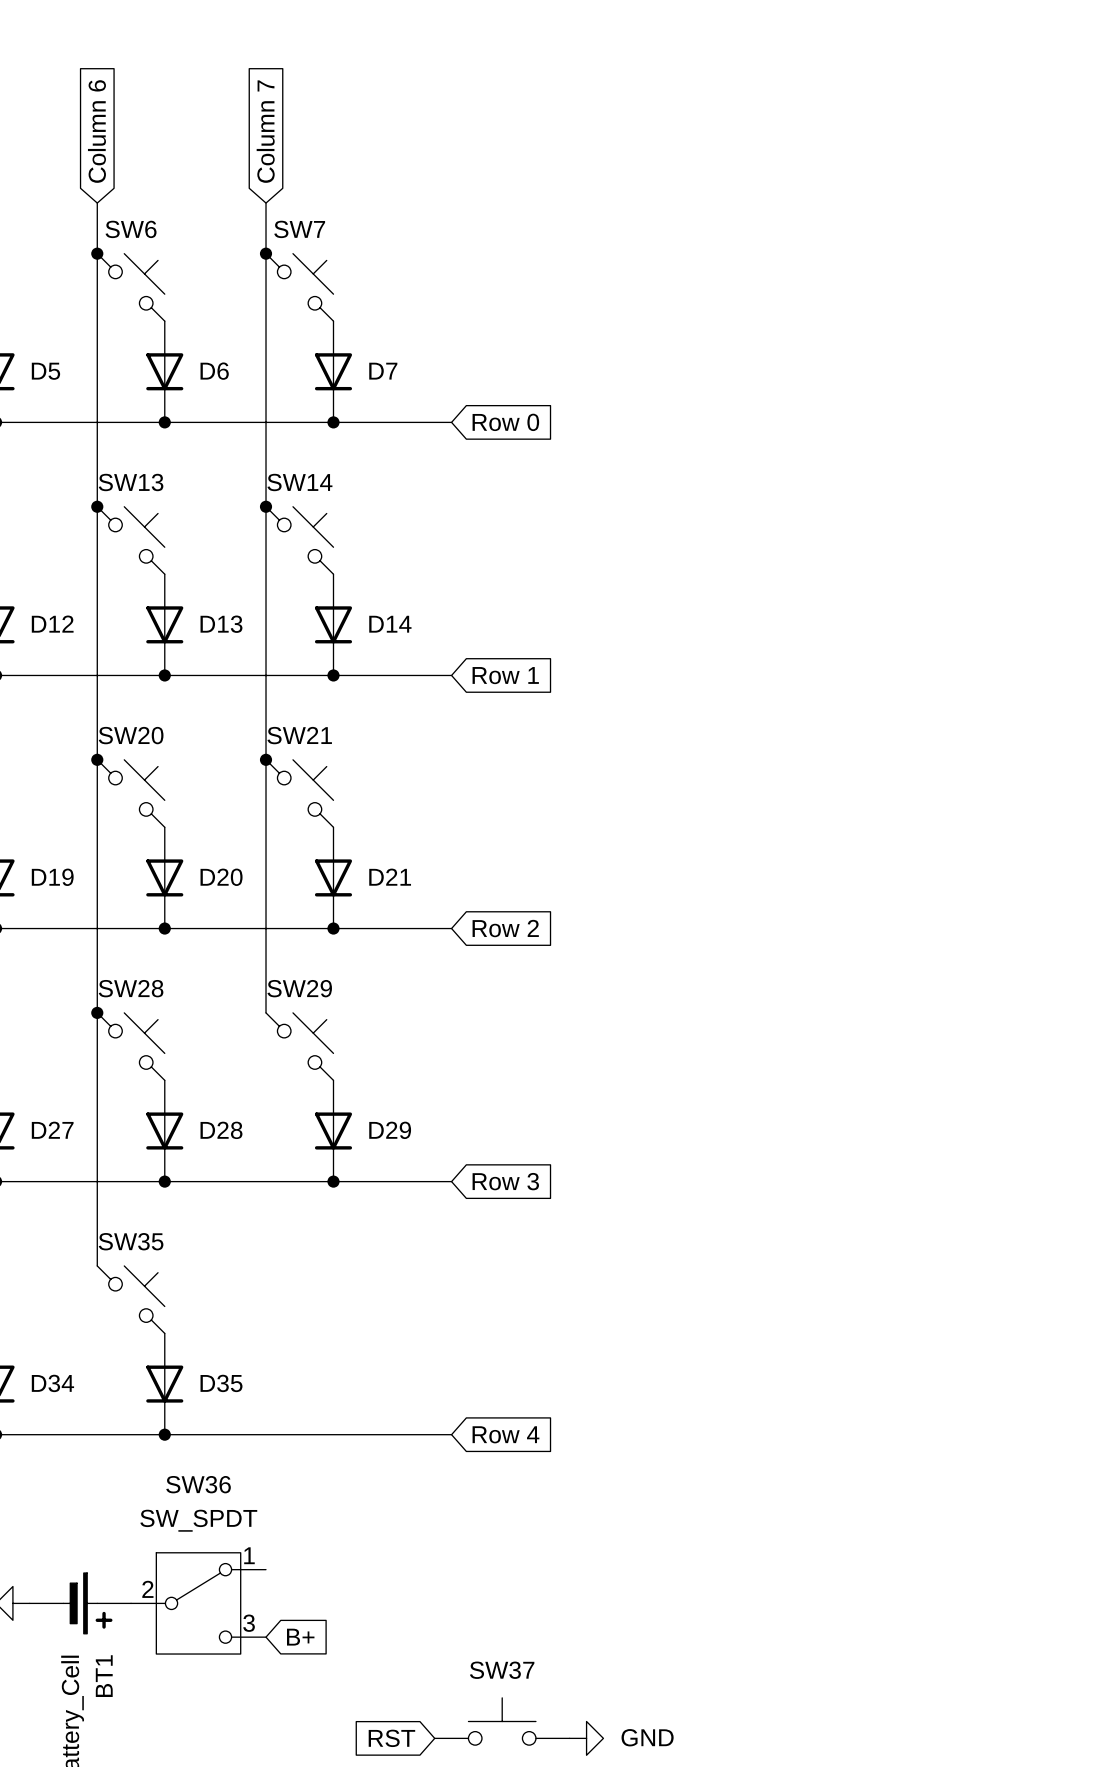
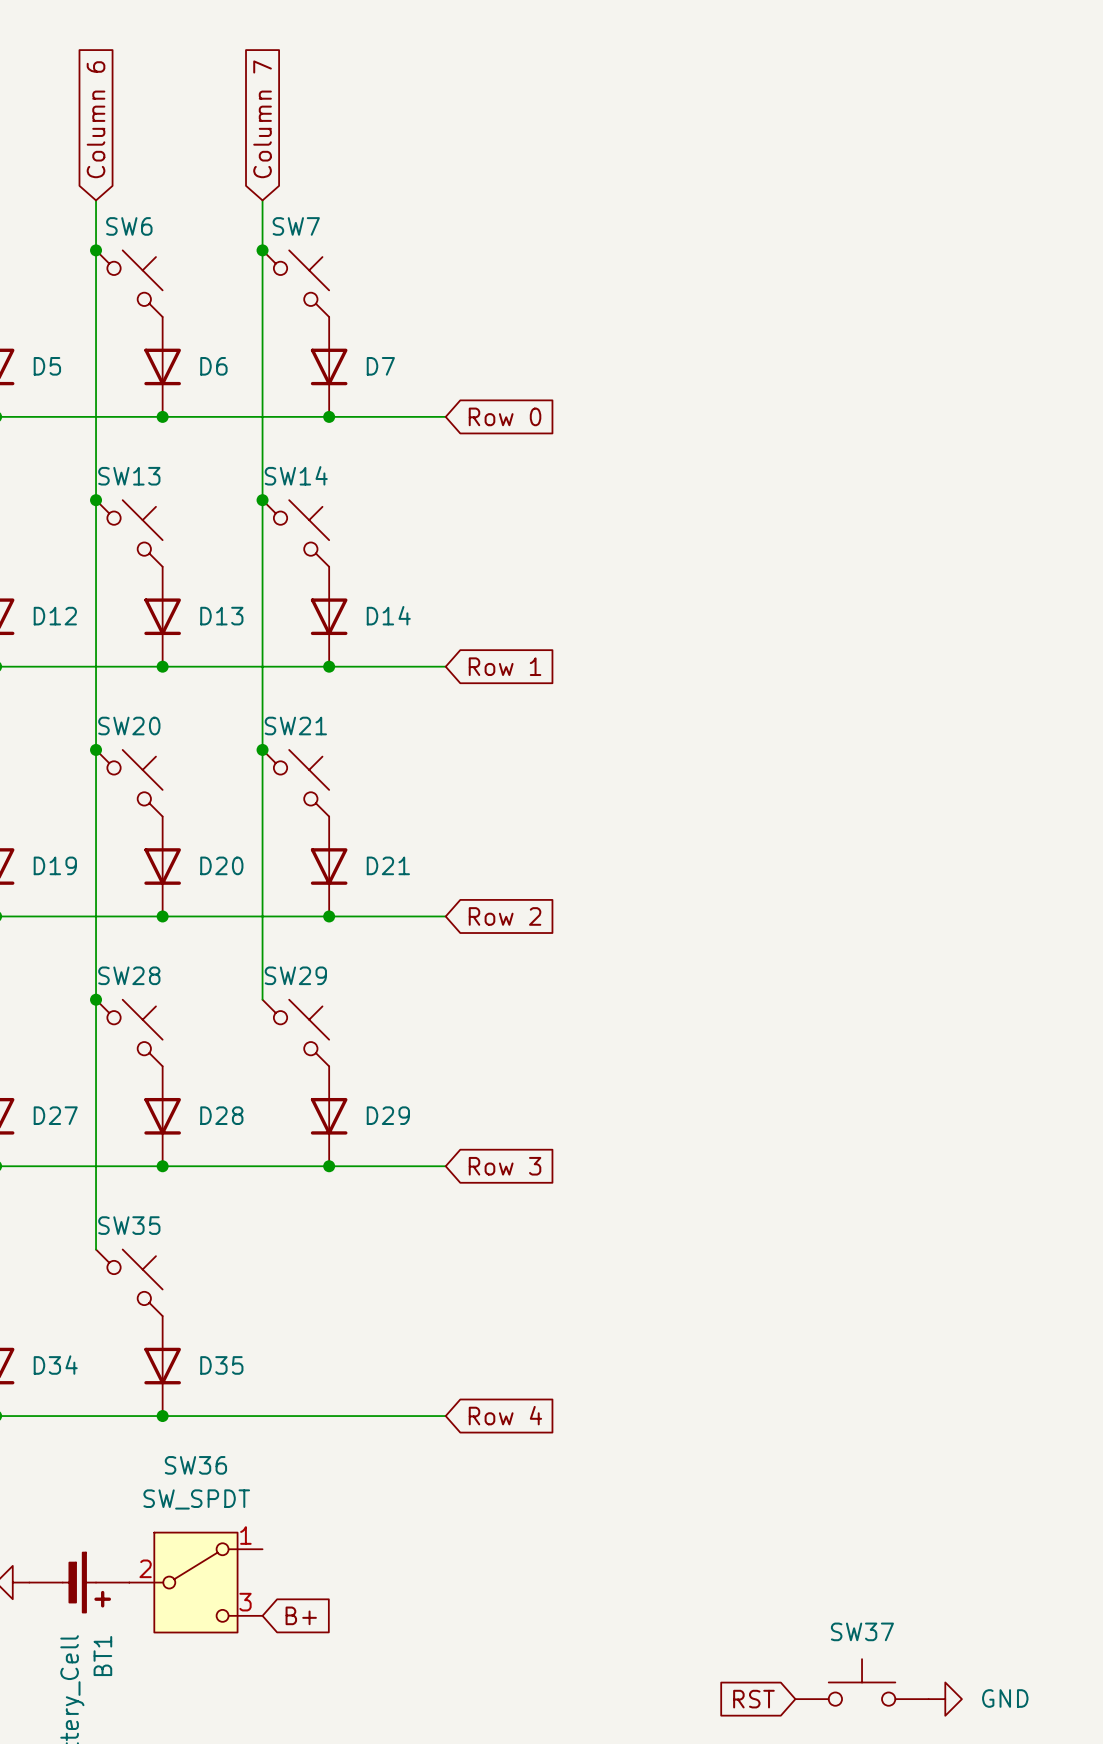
SW37 position: (502, 1721) -> (862, 1682)
global label: none -> RST (753, 1699)
power symbol: none -> GND (945, 1699)
global label: RST (391, 1738) -> none
power symbol: GND (586, 1738) -> none

